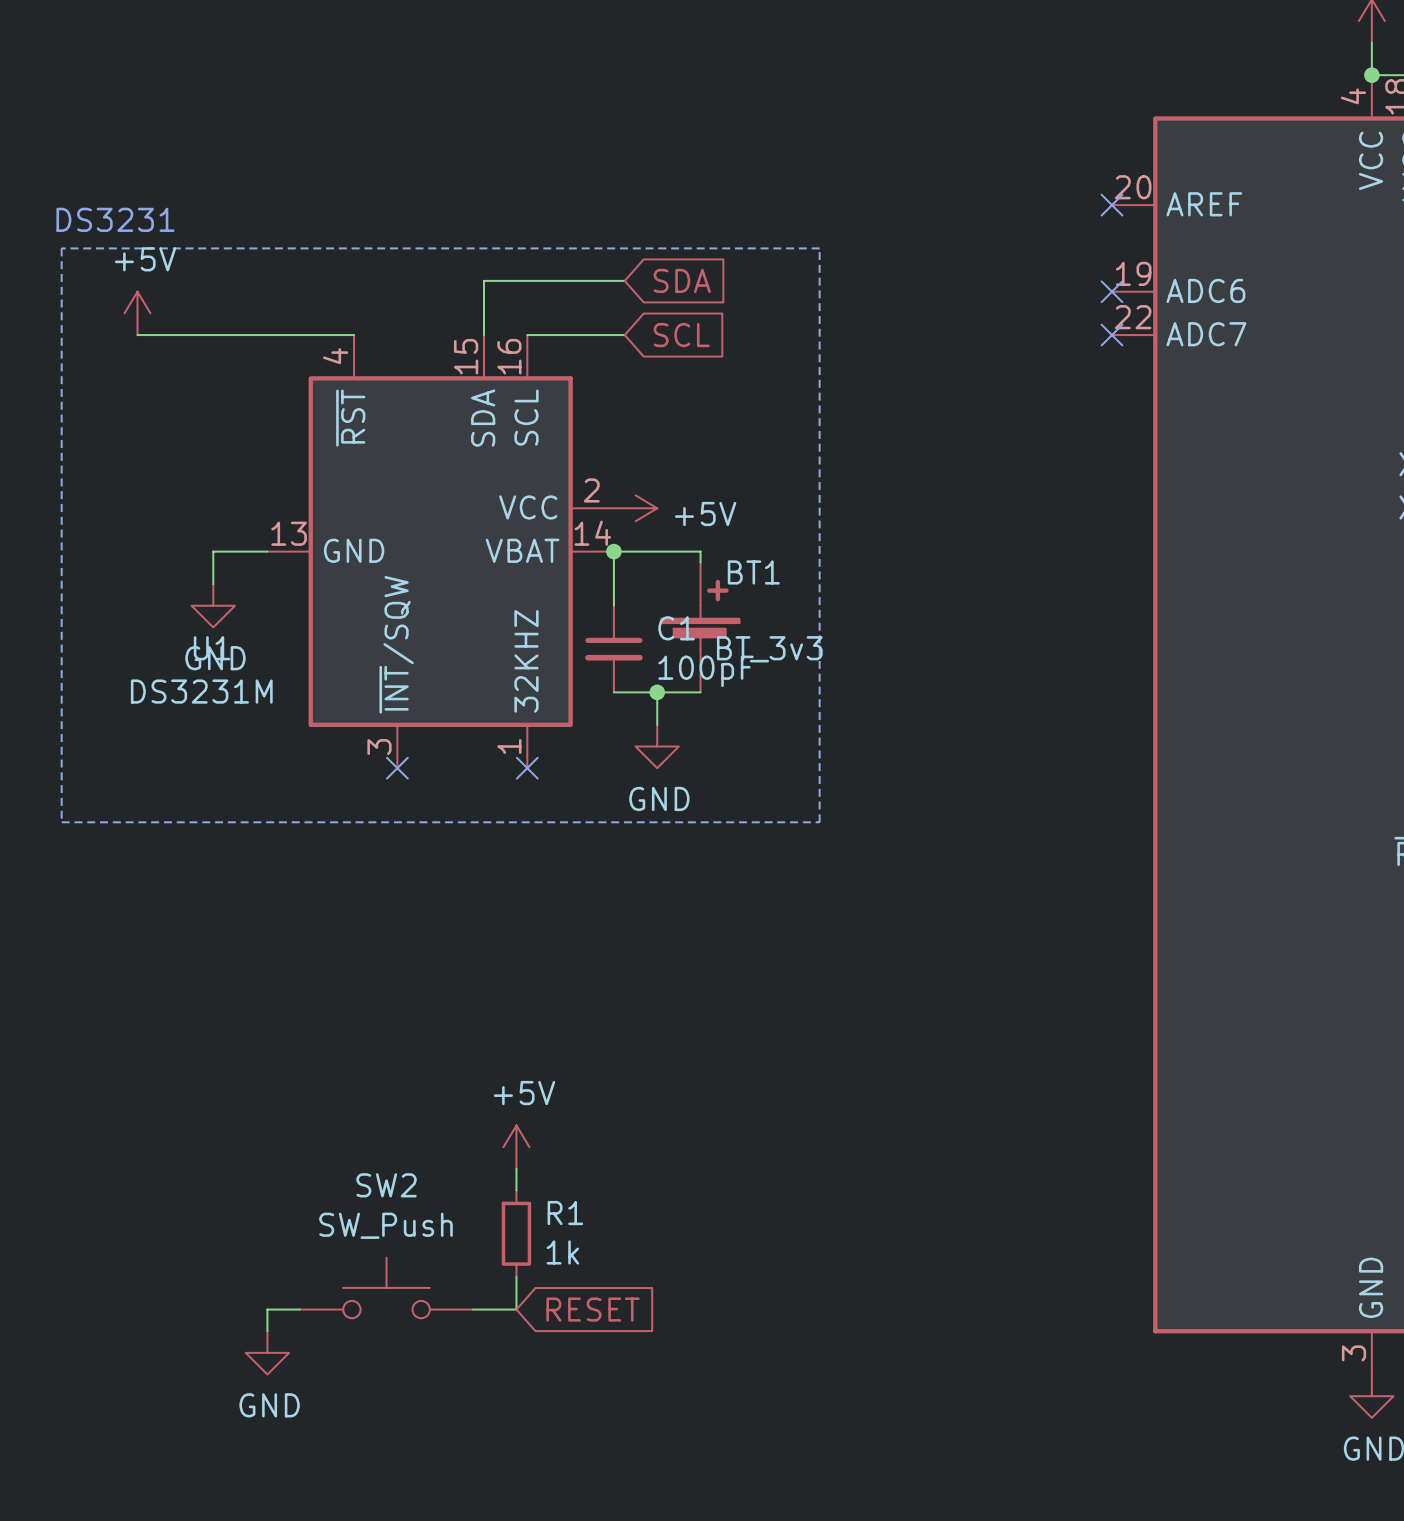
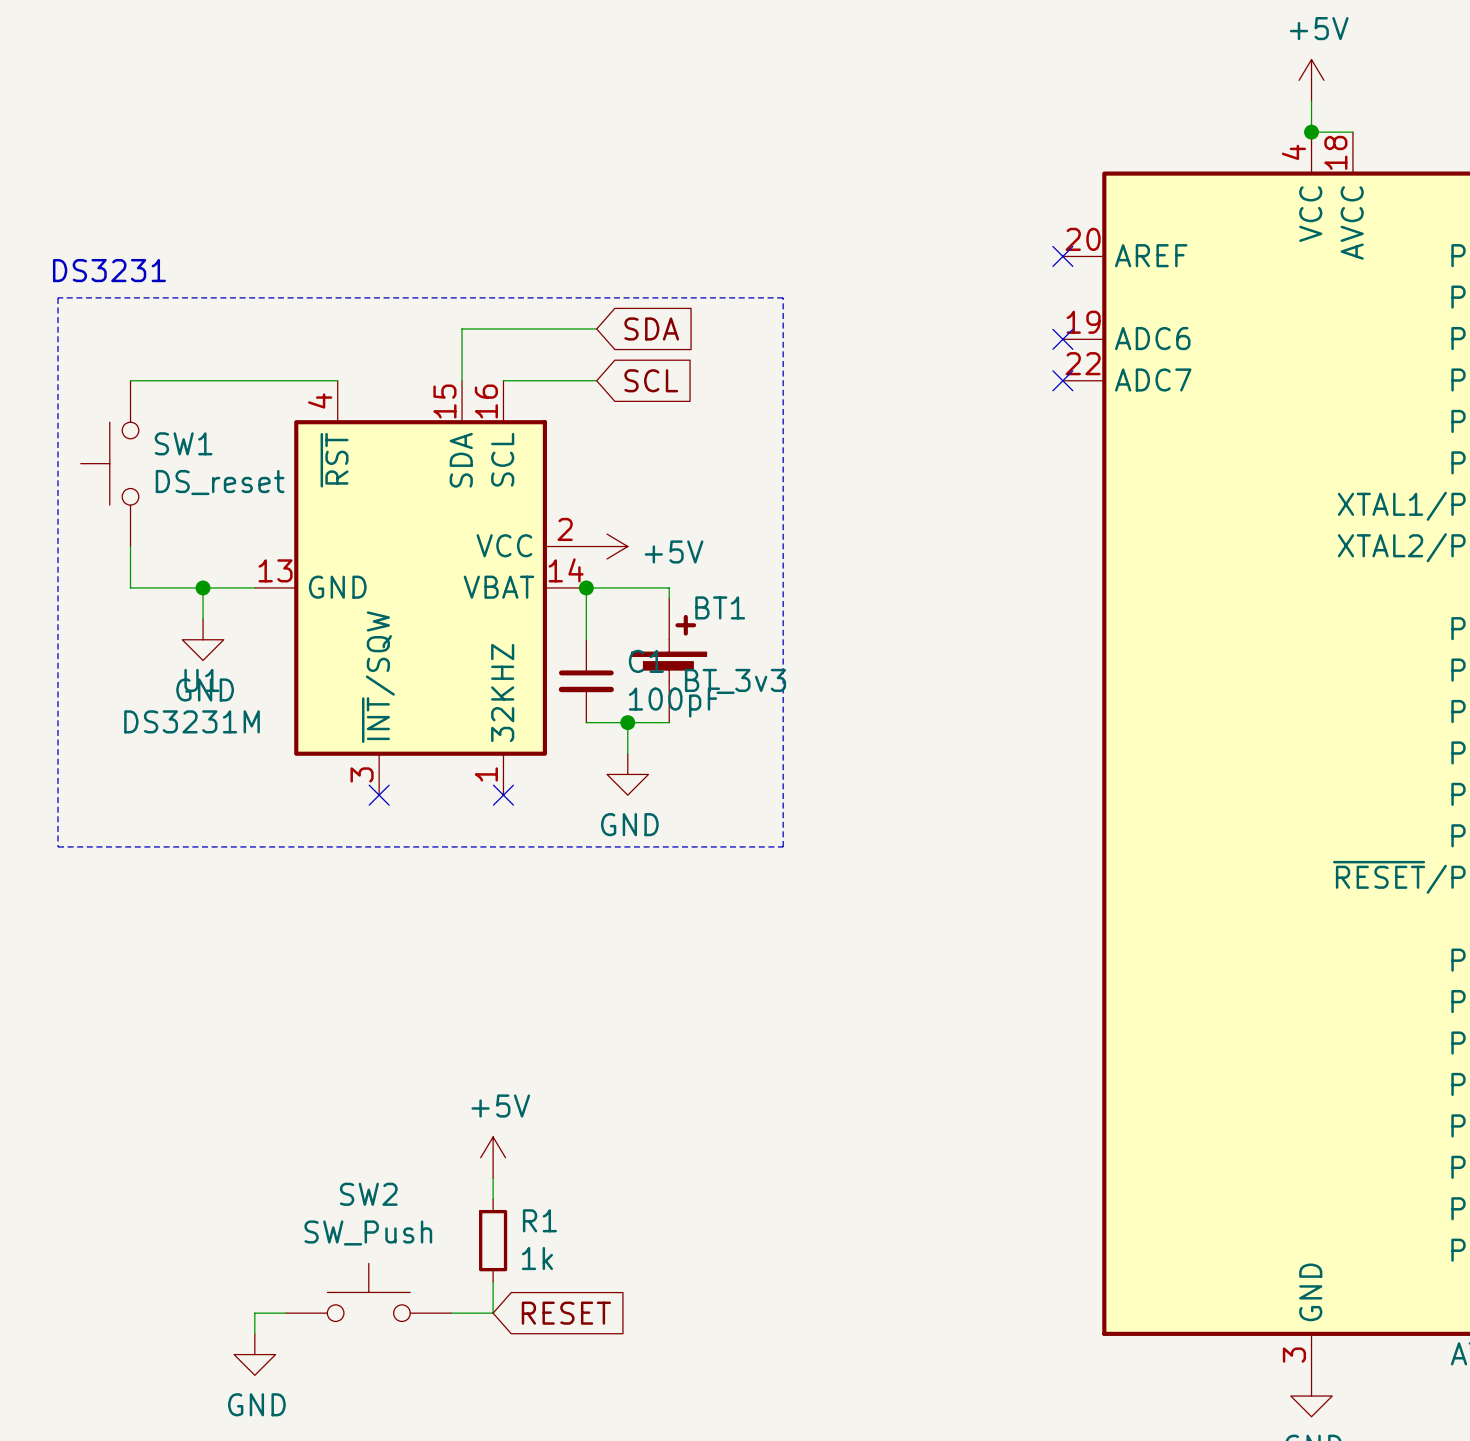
power symbol: +5V (137, 313) -> none
SW1: none -> DS_reset (109, 463)
wire: none -> (130, 546) (130, 587) (203, 587)
junction: none -> (203, 587)

